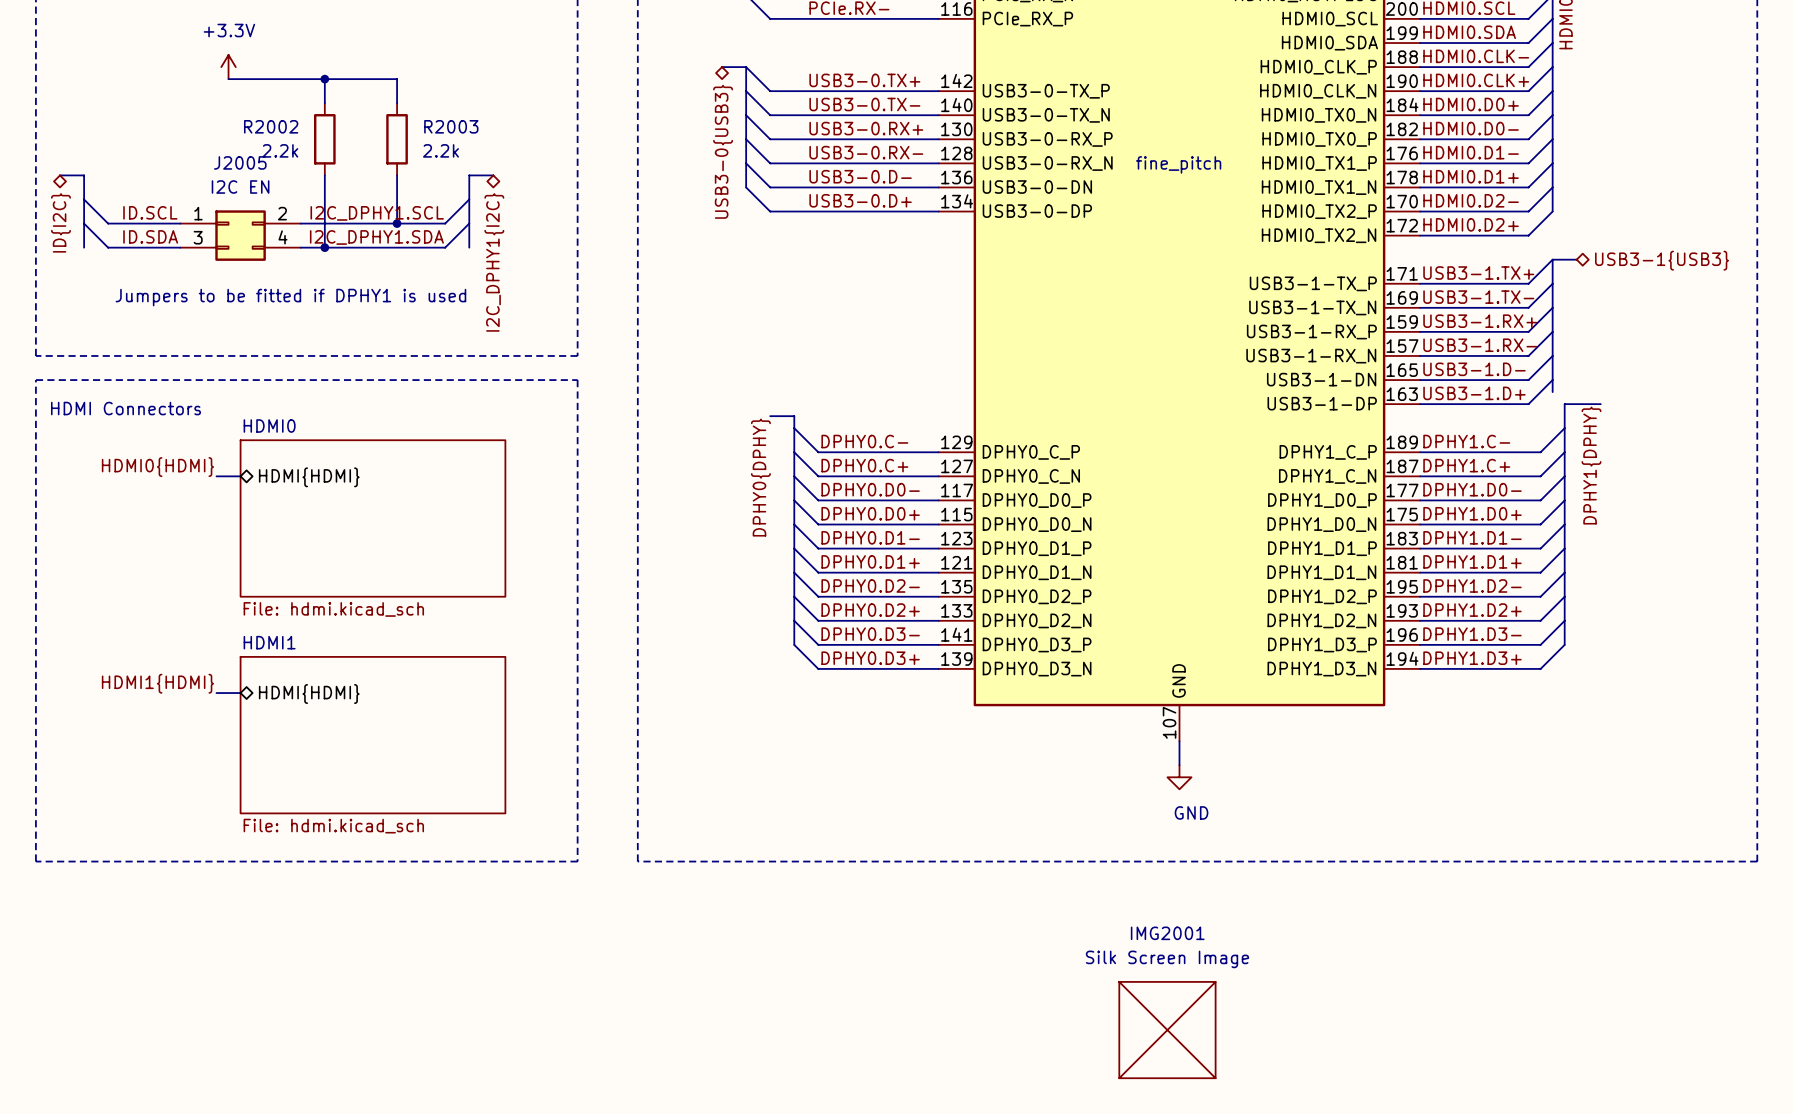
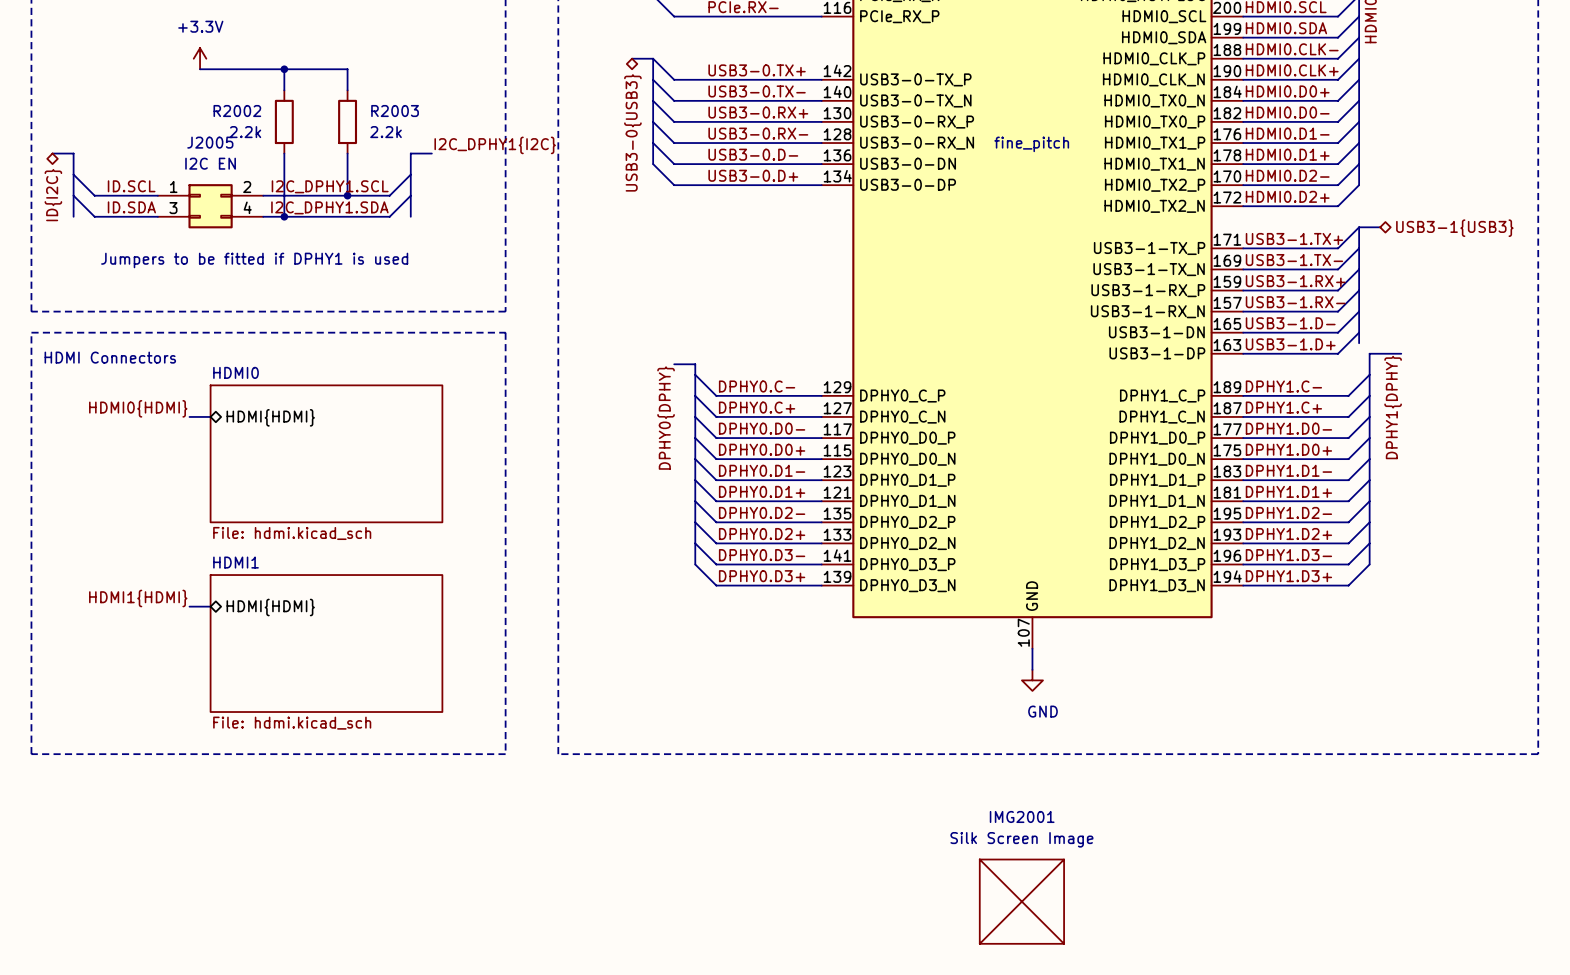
label: none -> I2C_DPHY1{I2C} (495, 145)
hierarchical label: I2C_DPHY1{I2C} (494, 262) -> none

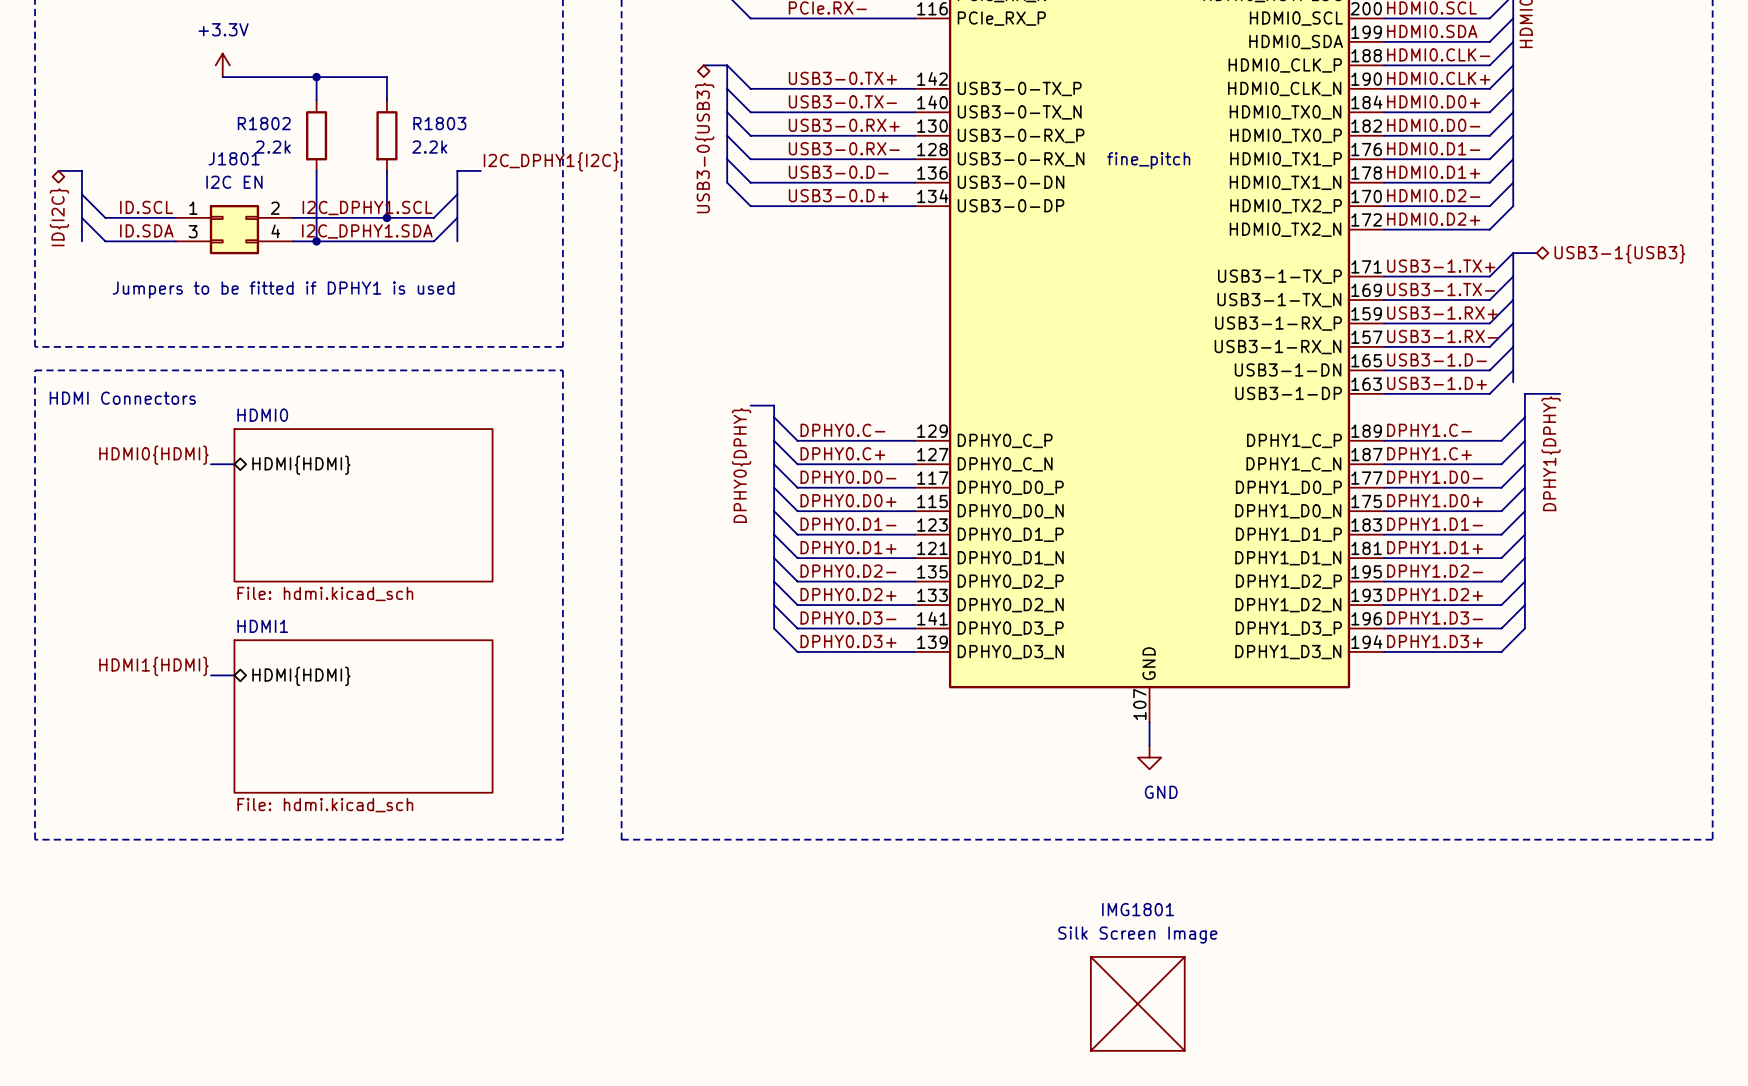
R2002 name: R2002 (237, 111) -> R1802 (264, 123)
R2003 name: R2003 (395, 111) -> R1803 (439, 123)
J2005 name: J2005 (210, 142) -> J1801 (234, 158)
IMG2001 name: IMG2001 (1022, 816) -> IMG1801 (1138, 909)

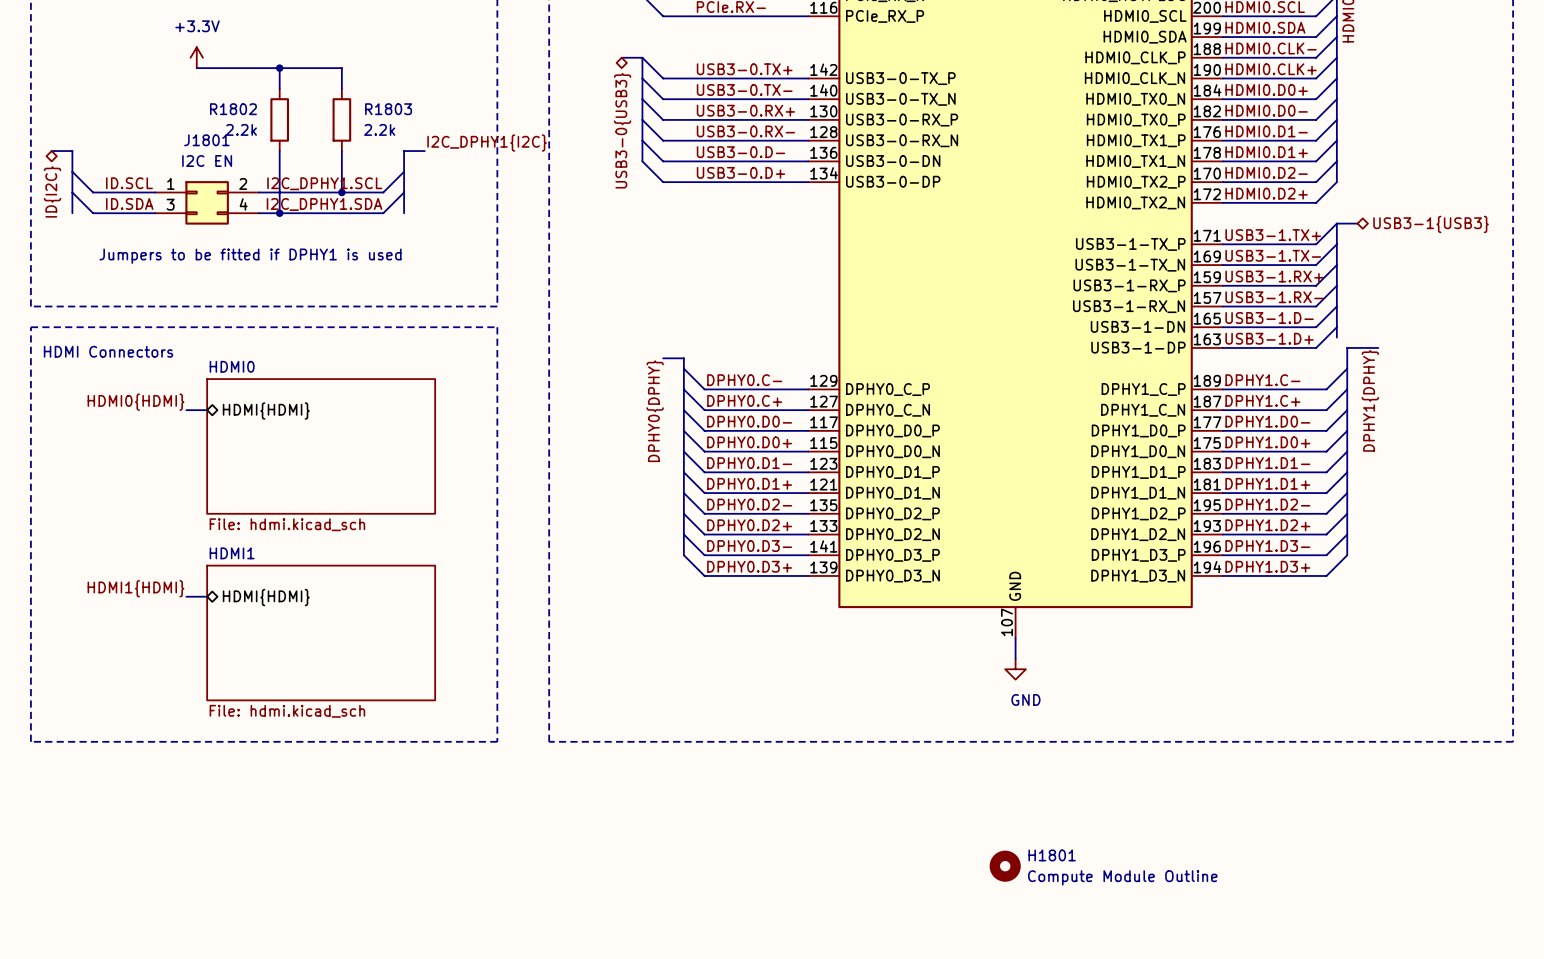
part text: fine_pitch (1148, 160) -> none
H1801: none -> Compute Module Outline (1005, 866)
IMG1801: Silk Screen Image (1137, 1003) -> none

